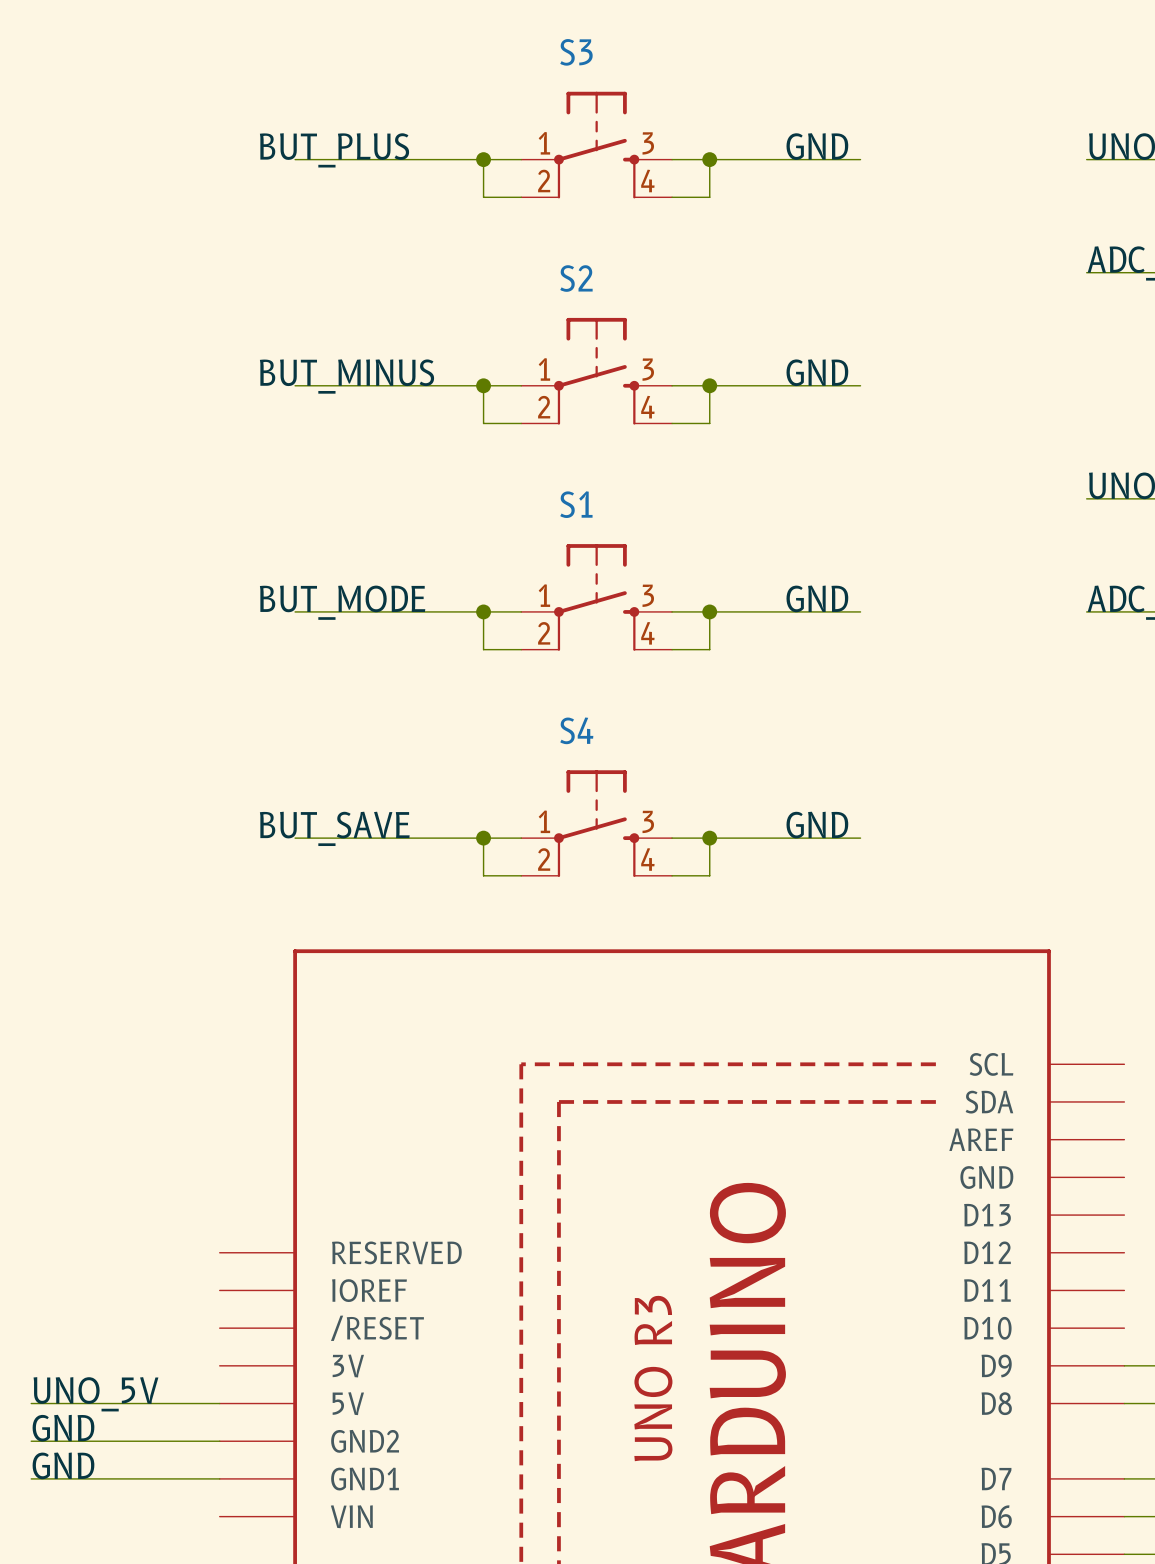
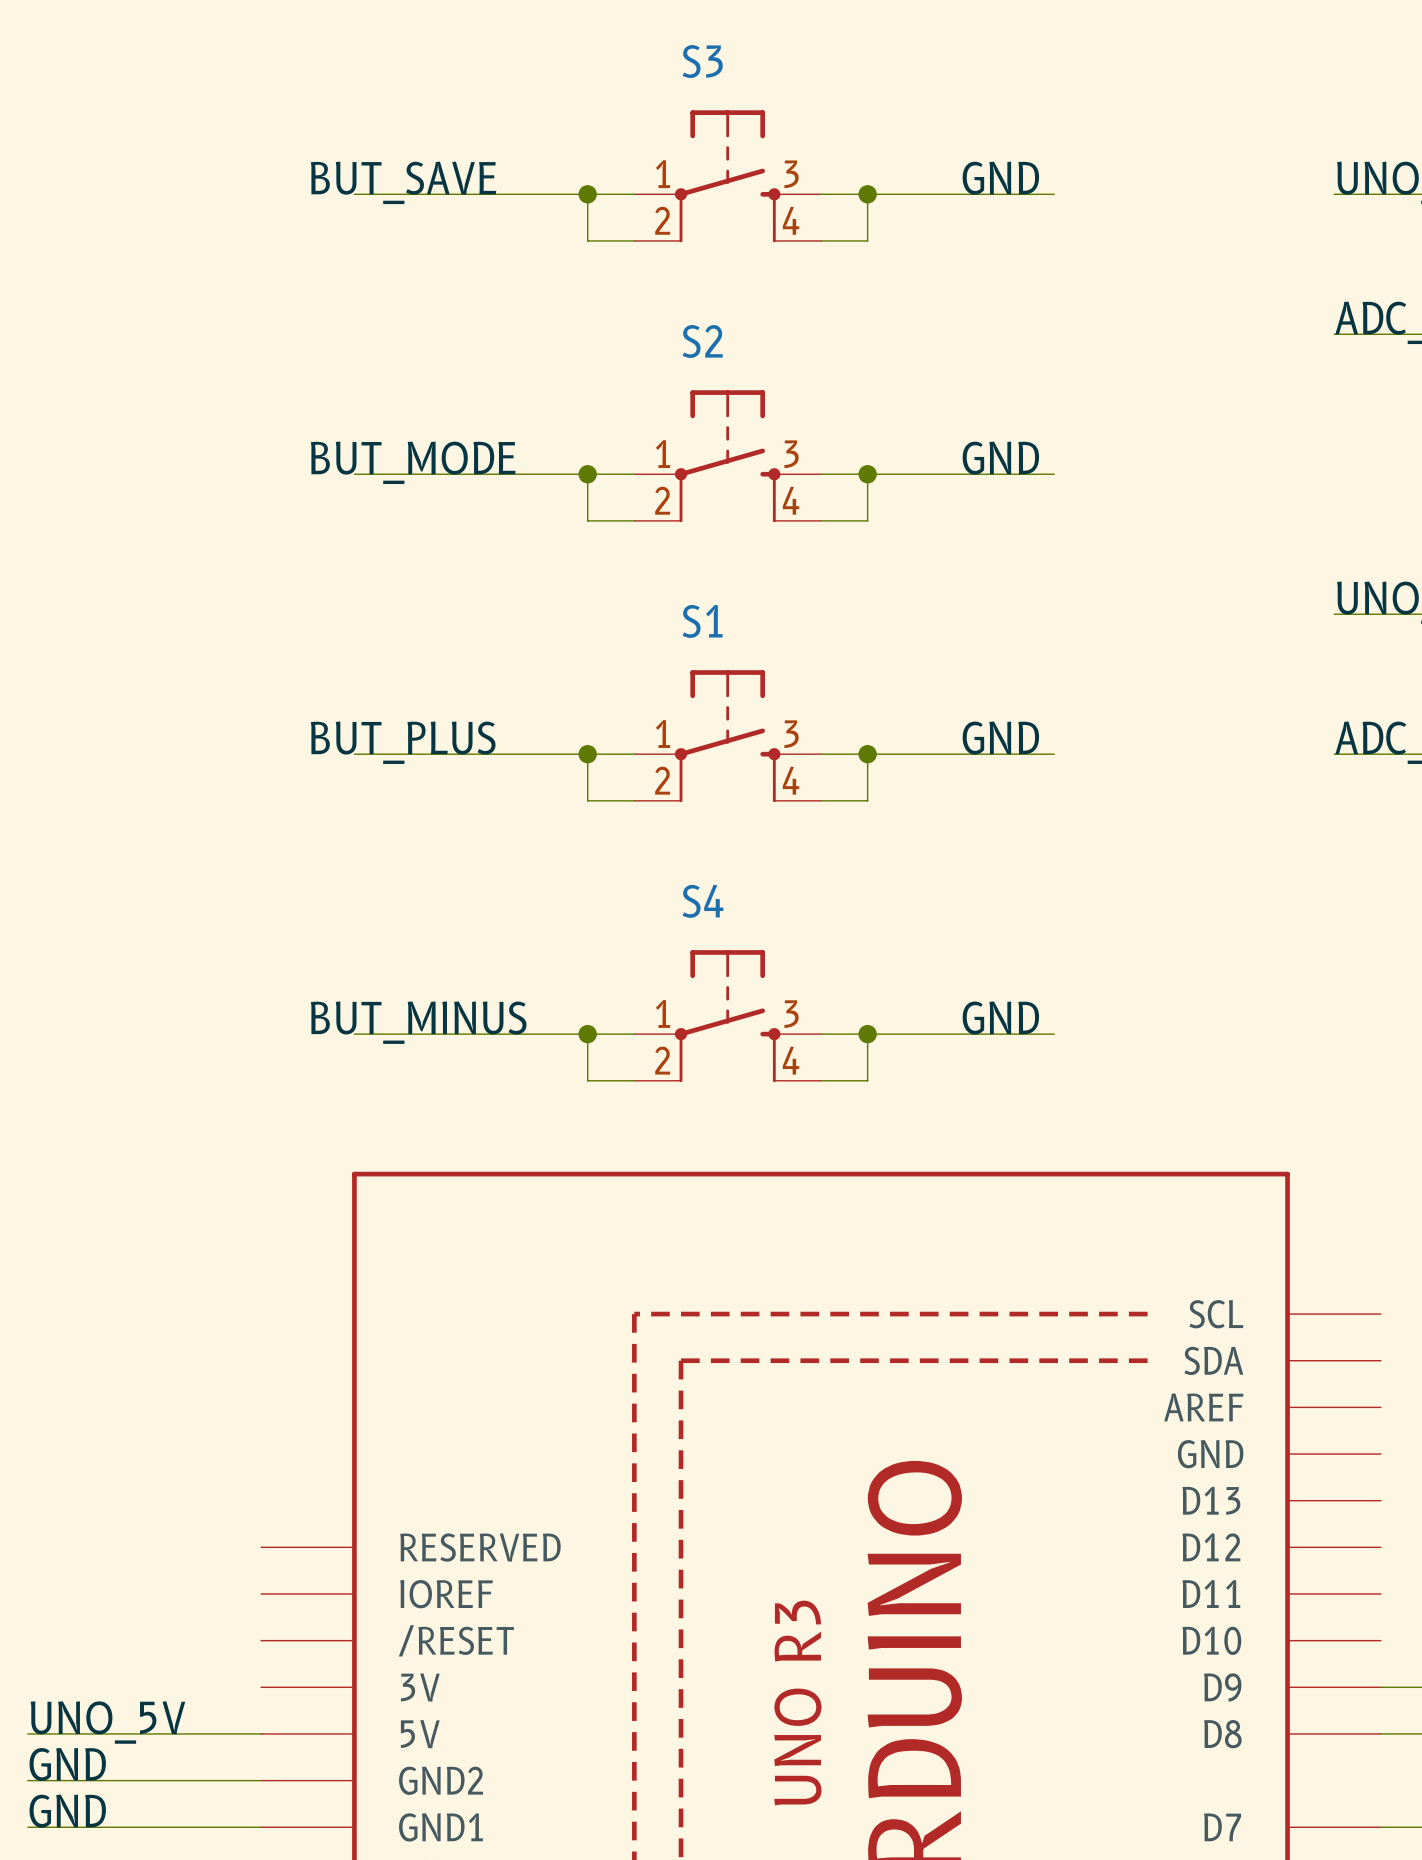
label: BUT_PLUS (334, 150) -> BUT_SAVE (403, 182)
label: BUT_MINUS (346, 376) -> BUT_MODE (413, 462)
label: BUT_MODE (342, 602) -> BUT_PLUS (403, 742)
label: BUT_SAVE (334, 828) -> BUT_MINUS (418, 1022)

